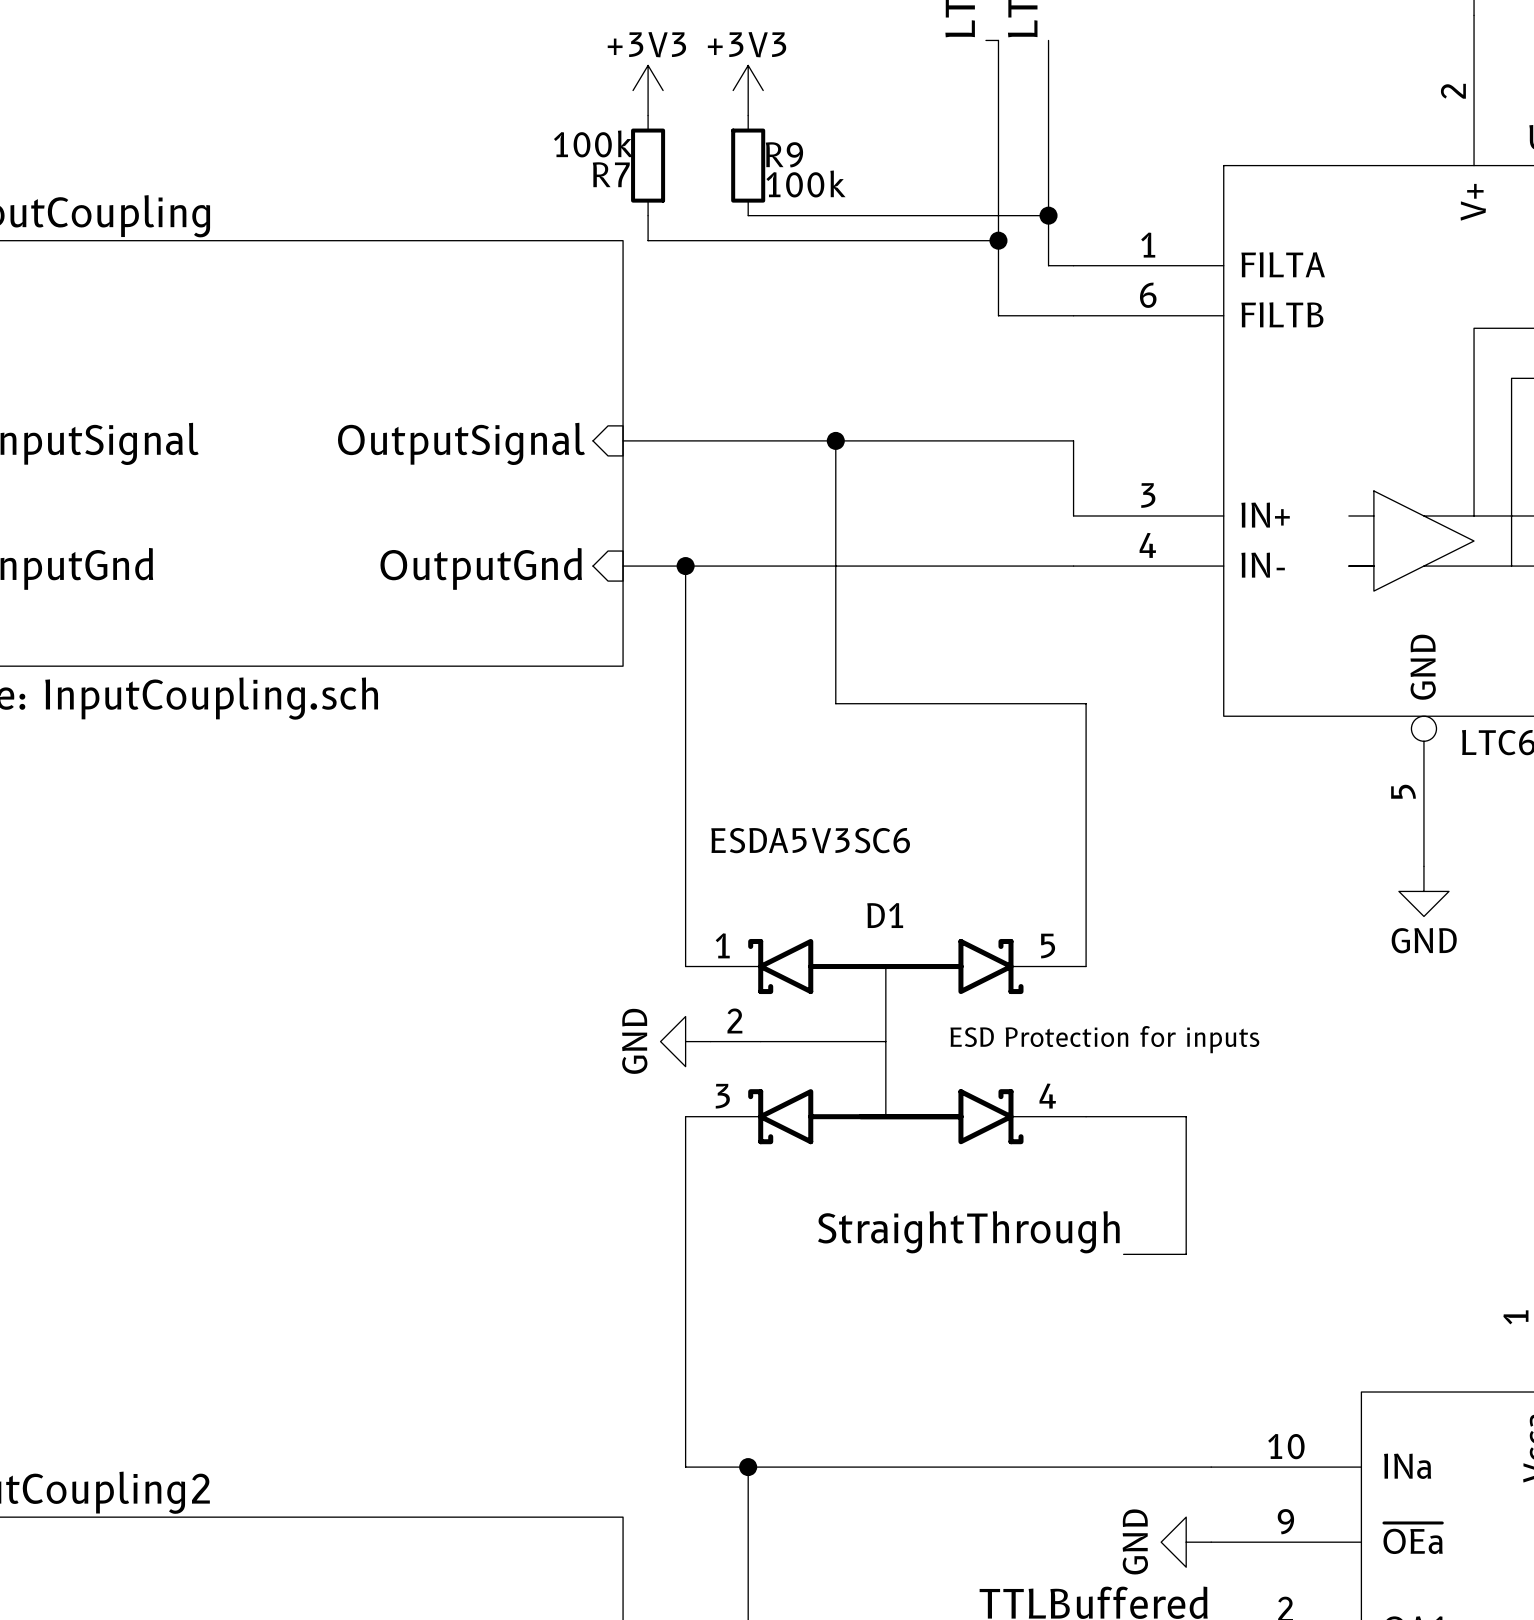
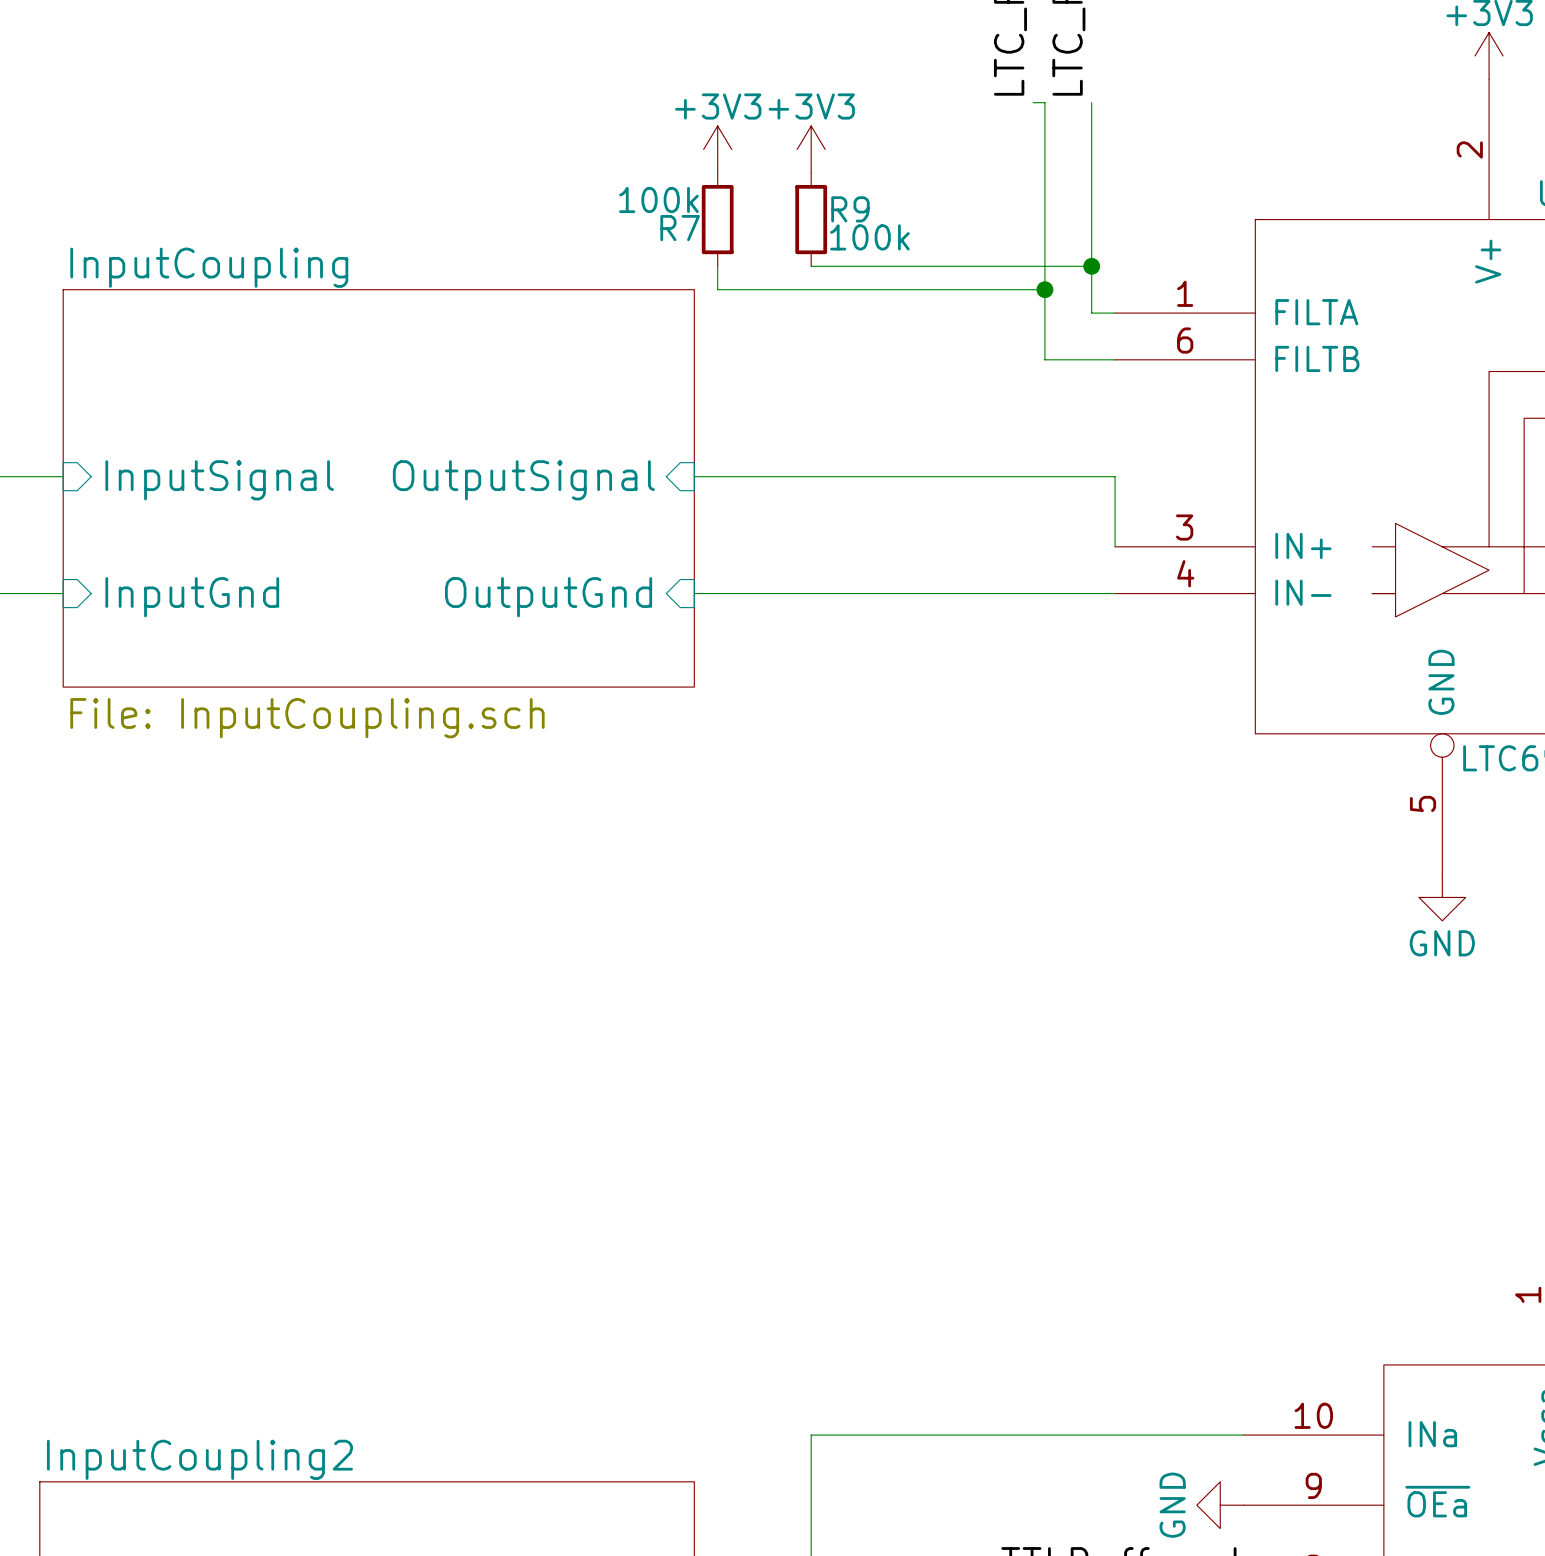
wire: (835, 440) (835, 703) (1086, 703) (1086, 966) -> none
junction: (835, 440) -> none
wire: (685, 566) (685, 966) -> none
junction: (685, 566) -> none
text: ESD Protection for inputs (1104, 1039) -> none
power symbol: GND (685, 1041) -> none
D1: ESDA5V3SC6 (885, 1041) -> none
wire: (685, 1116) (685, 1467) (748, 1467) -> none
wire: (1086, 1116) (1186, 1116) (1186, 1254) (1123, 1254) -> none
label: StraightThrough (968, 1232) -> none
junction: (748, 1467) -> none

